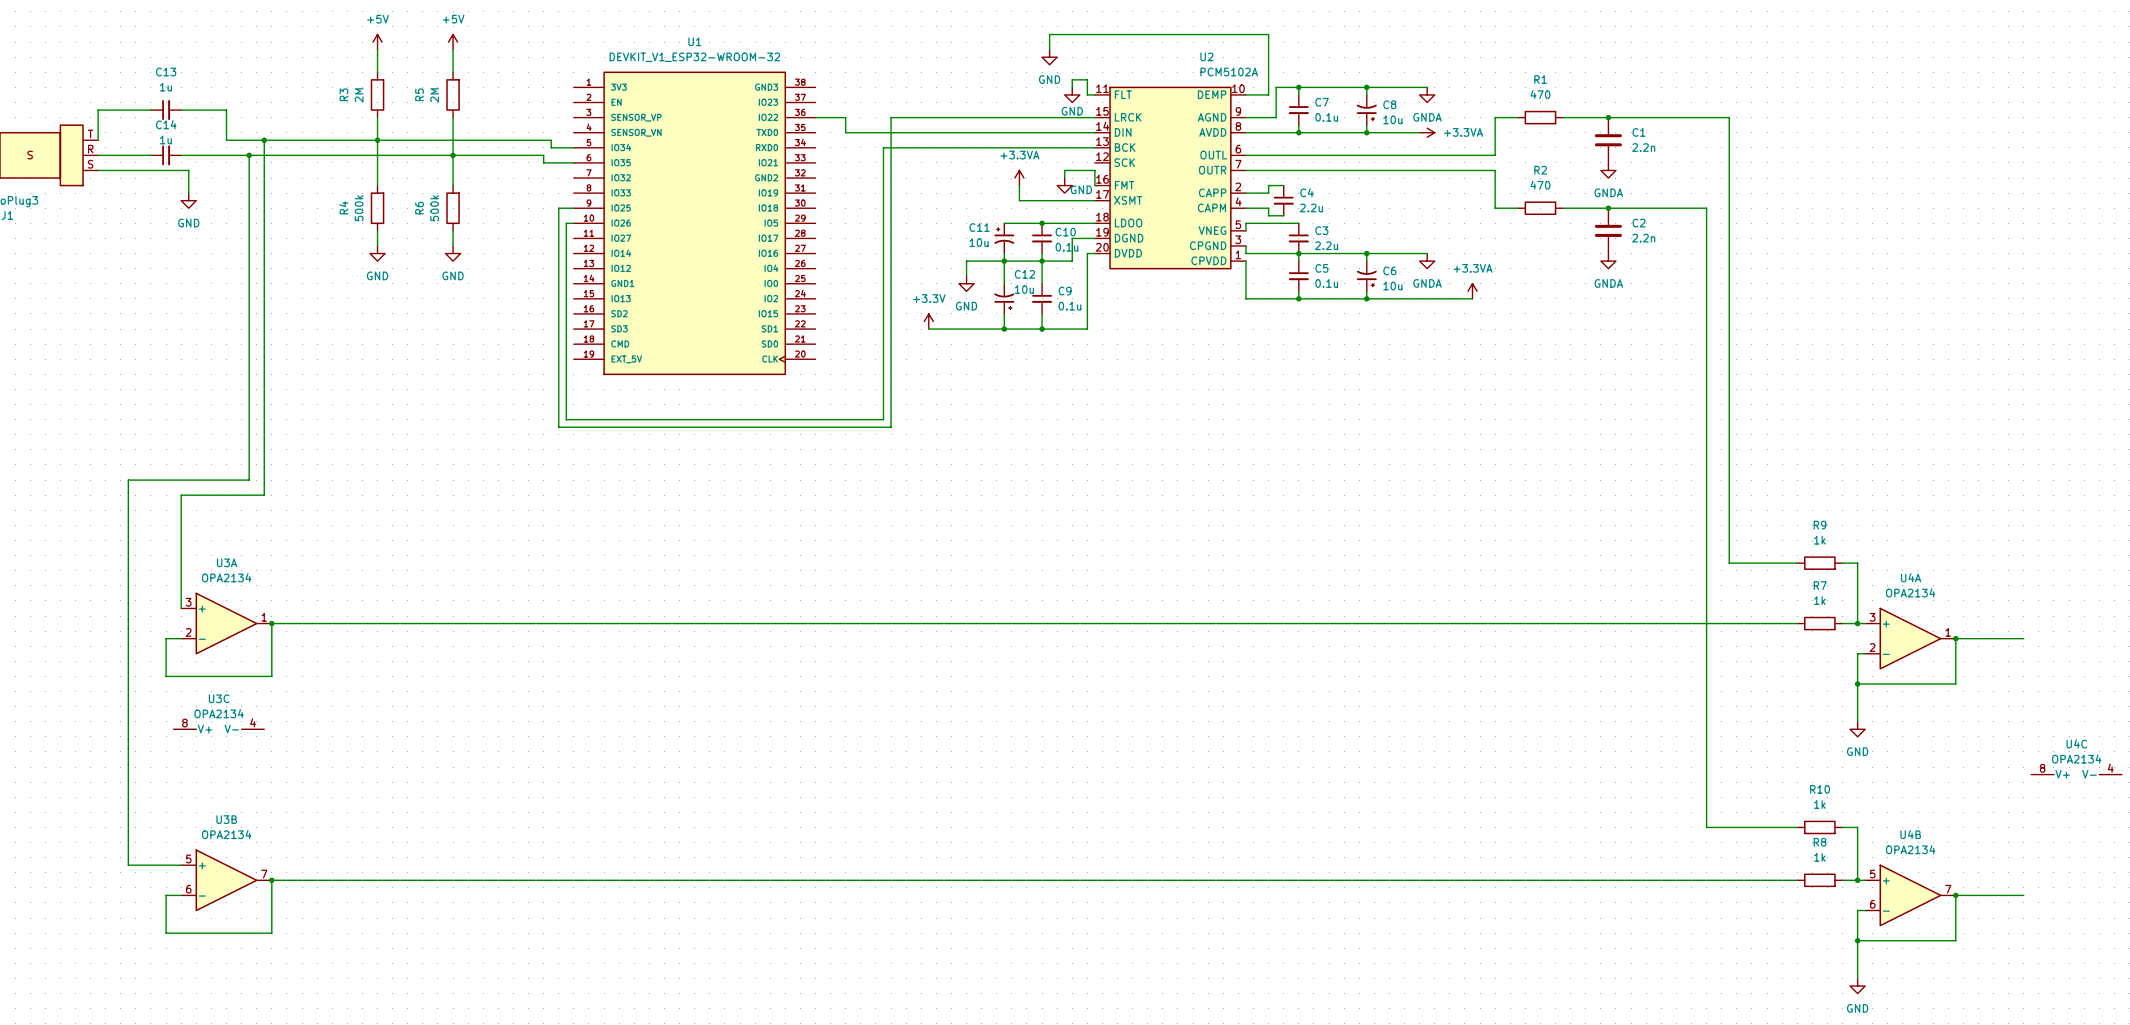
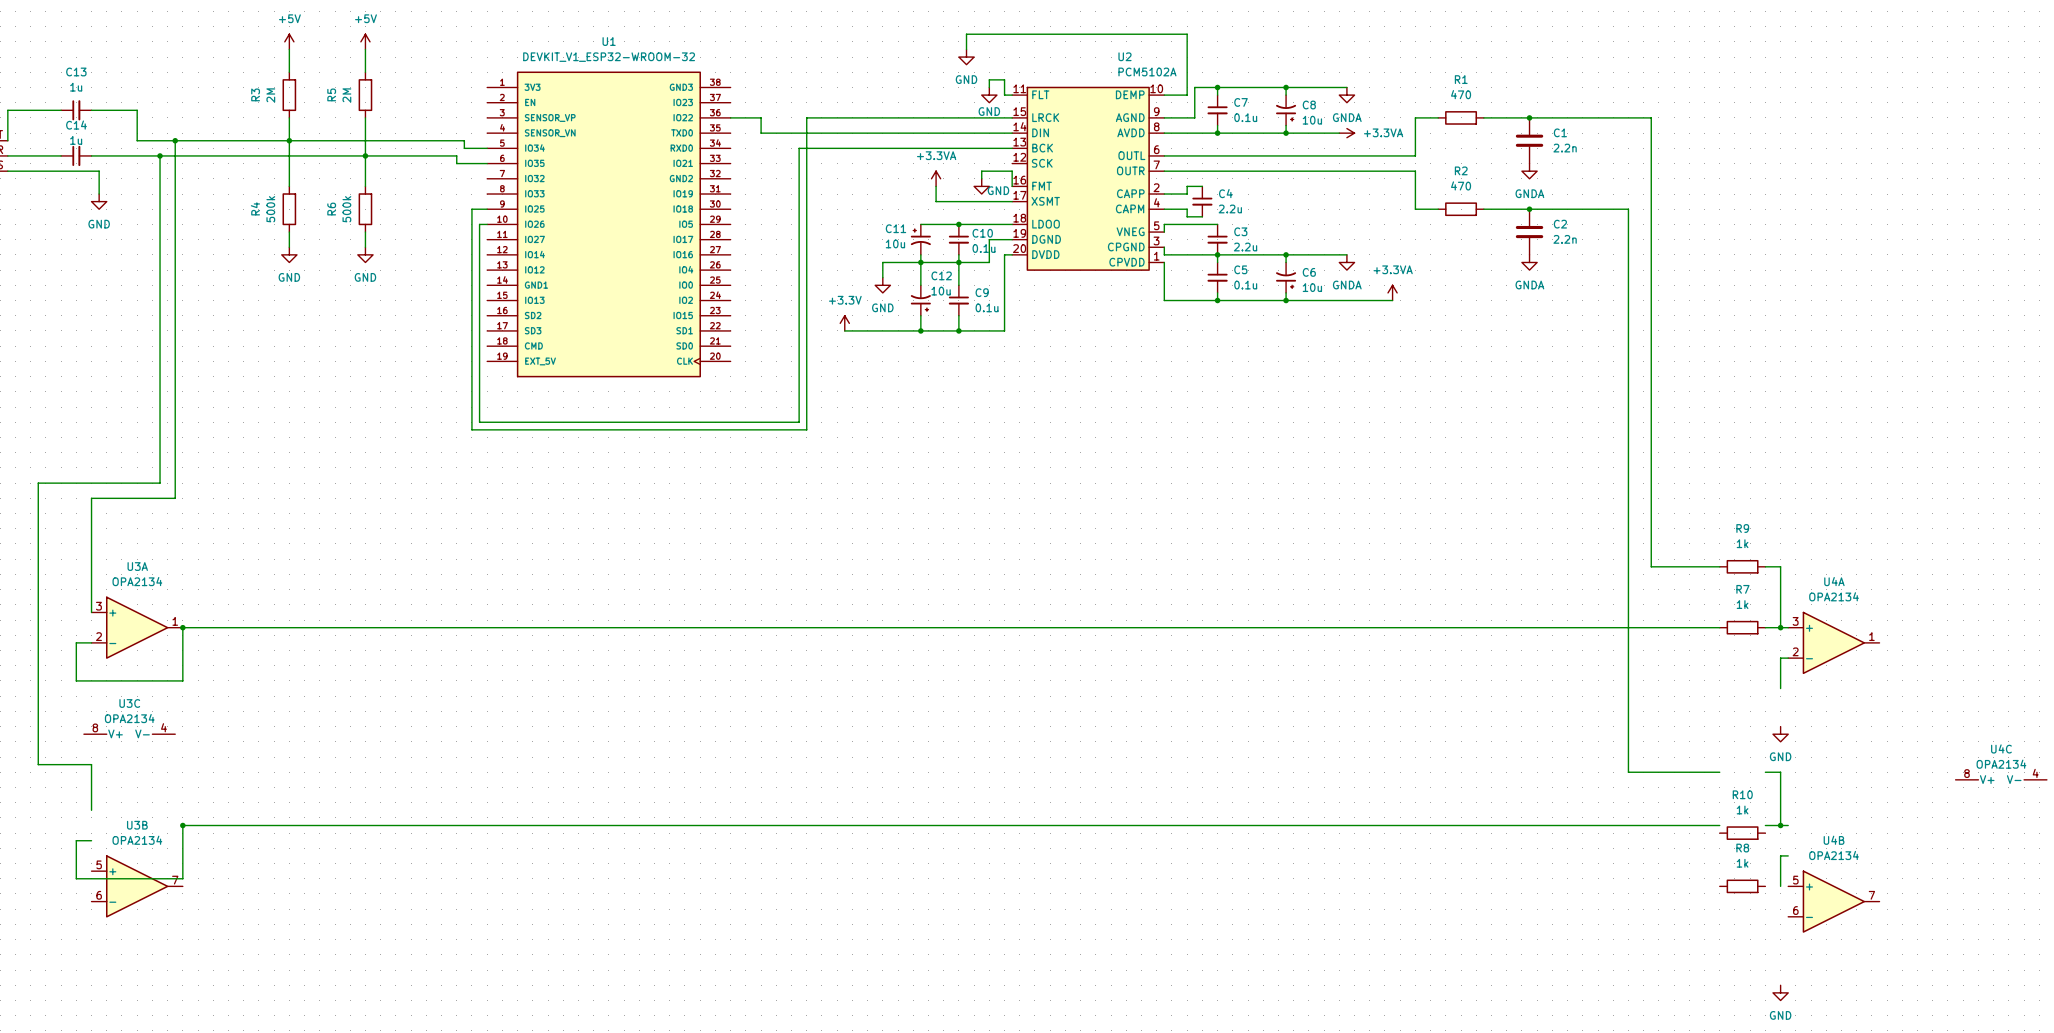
junction: (1955, 638) -> none
wire: (2023, 638) (1955, 638) (1955, 683) (1857, 683) (1857, 721) -> none
junction: (1857, 683) -> none
wire: (128, 759) (128, 865) (181, 865) -> (38, 764) (91, 764) (91, 810)
wire: (1706, 767) (1706, 827) (1797, 827) -> (1628, 772) (1719, 772)
wire: none -> (1765, 772) (1780, 772) (1780, 825)
junction: none -> (182, 825)
junction: none -> (1780, 825)
wire: (1842, 827) (1857, 827) (1857, 850) -> (1788, 855) (1780, 855)
junction: (271, 880) -> none
wire: (1797, 880) (271, 880) (271, 933) (166, 933) (166, 895) (181, 895) -> (1719, 825) (182, 825) (182, 878) (76, 878) (76, 840) (91, 840)
wire: (1842, 880) (1865, 880) -> (1765, 825) (1788, 825)
junction: (1857, 880) -> none
junction: (1955, 895) -> none
wire: (2023, 895) (1955, 895) (1955, 940) (1857, 940) -> none
wire: (1865, 910) (1857, 910) (1857, 978) -> none
junction: (1857, 940) -> none

